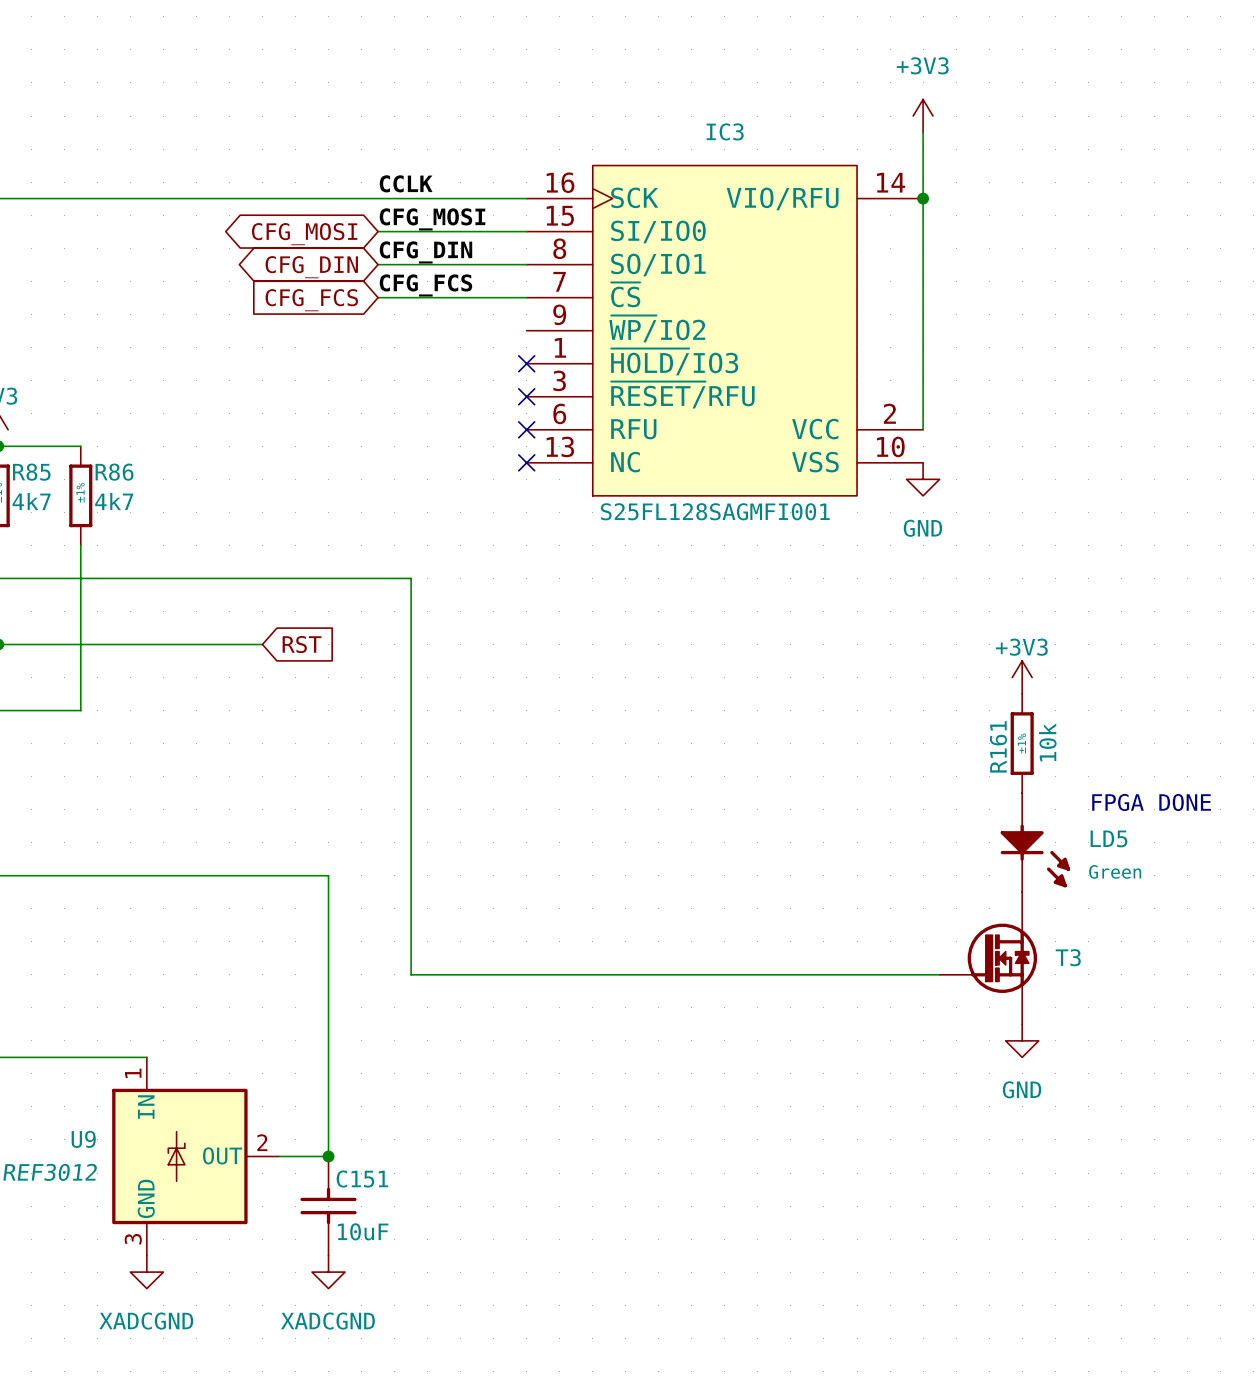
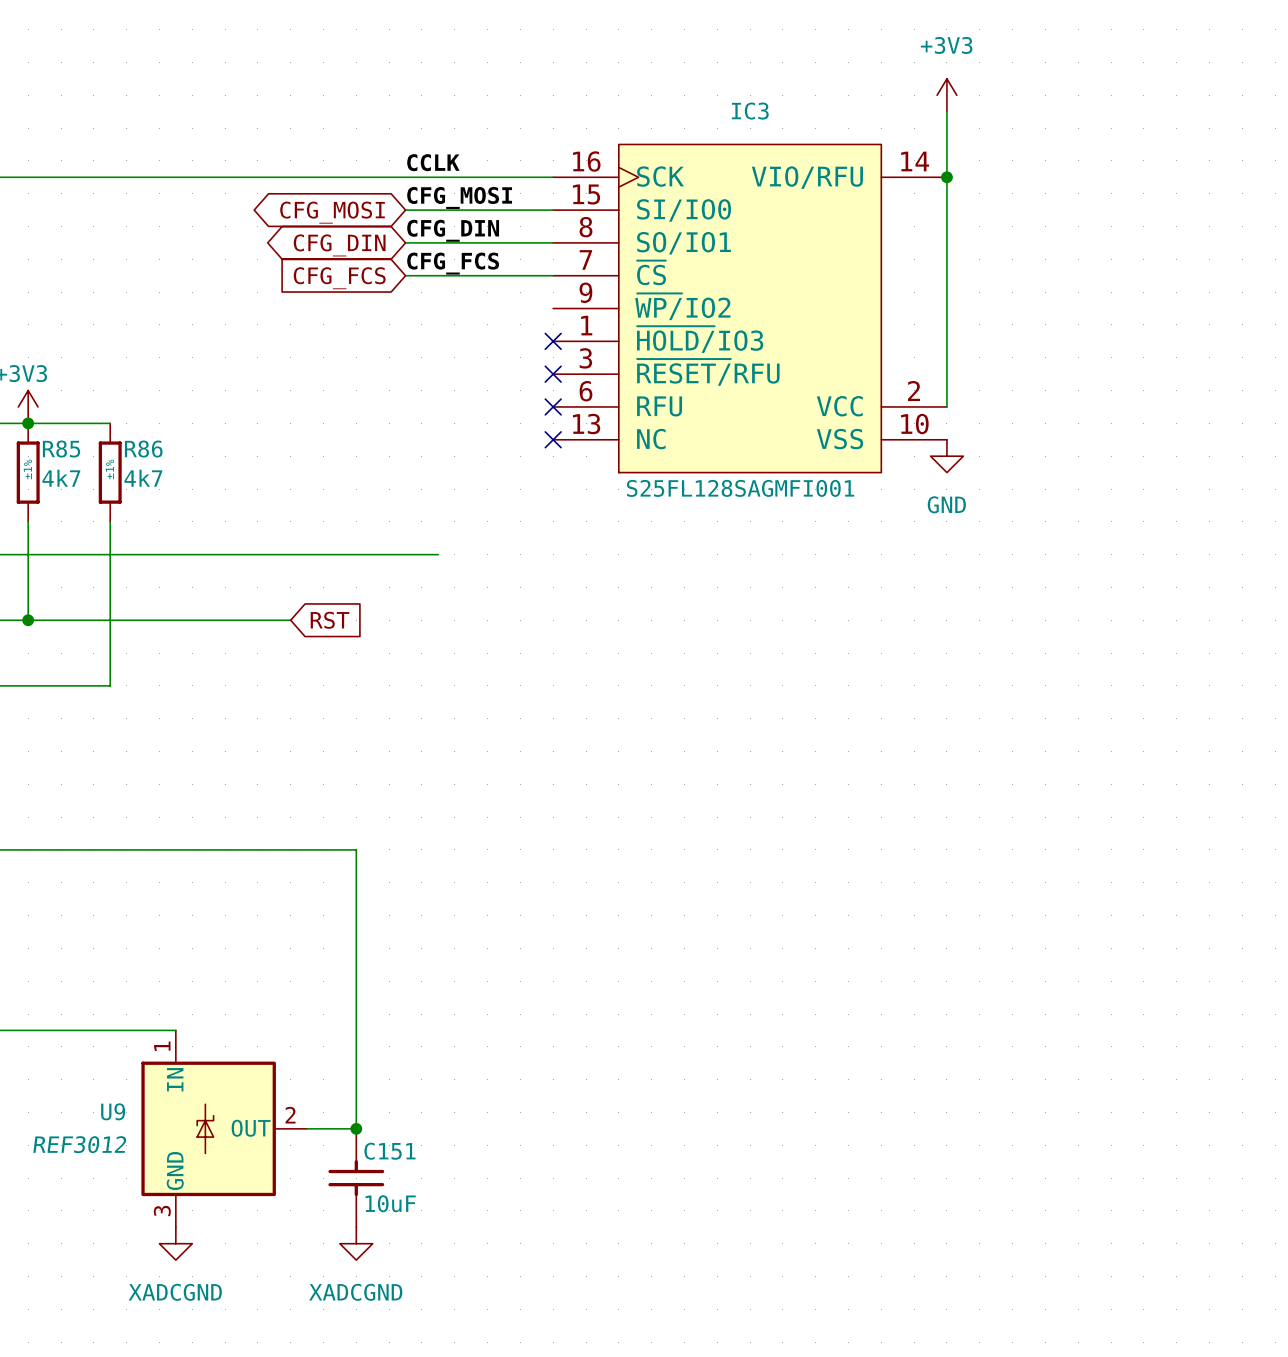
wire: (411, 578) (411, 974) (939, 974) -> none
power symbol: +3V3 (1022, 677) -> none
R161: (1022, 743) -> none
text: FPGA DONE (1151, 802) -> none
LD5: (1035, 842) -> none
T3: (988, 958) -> none
power symbol: GND (1022, 1040) -> none

